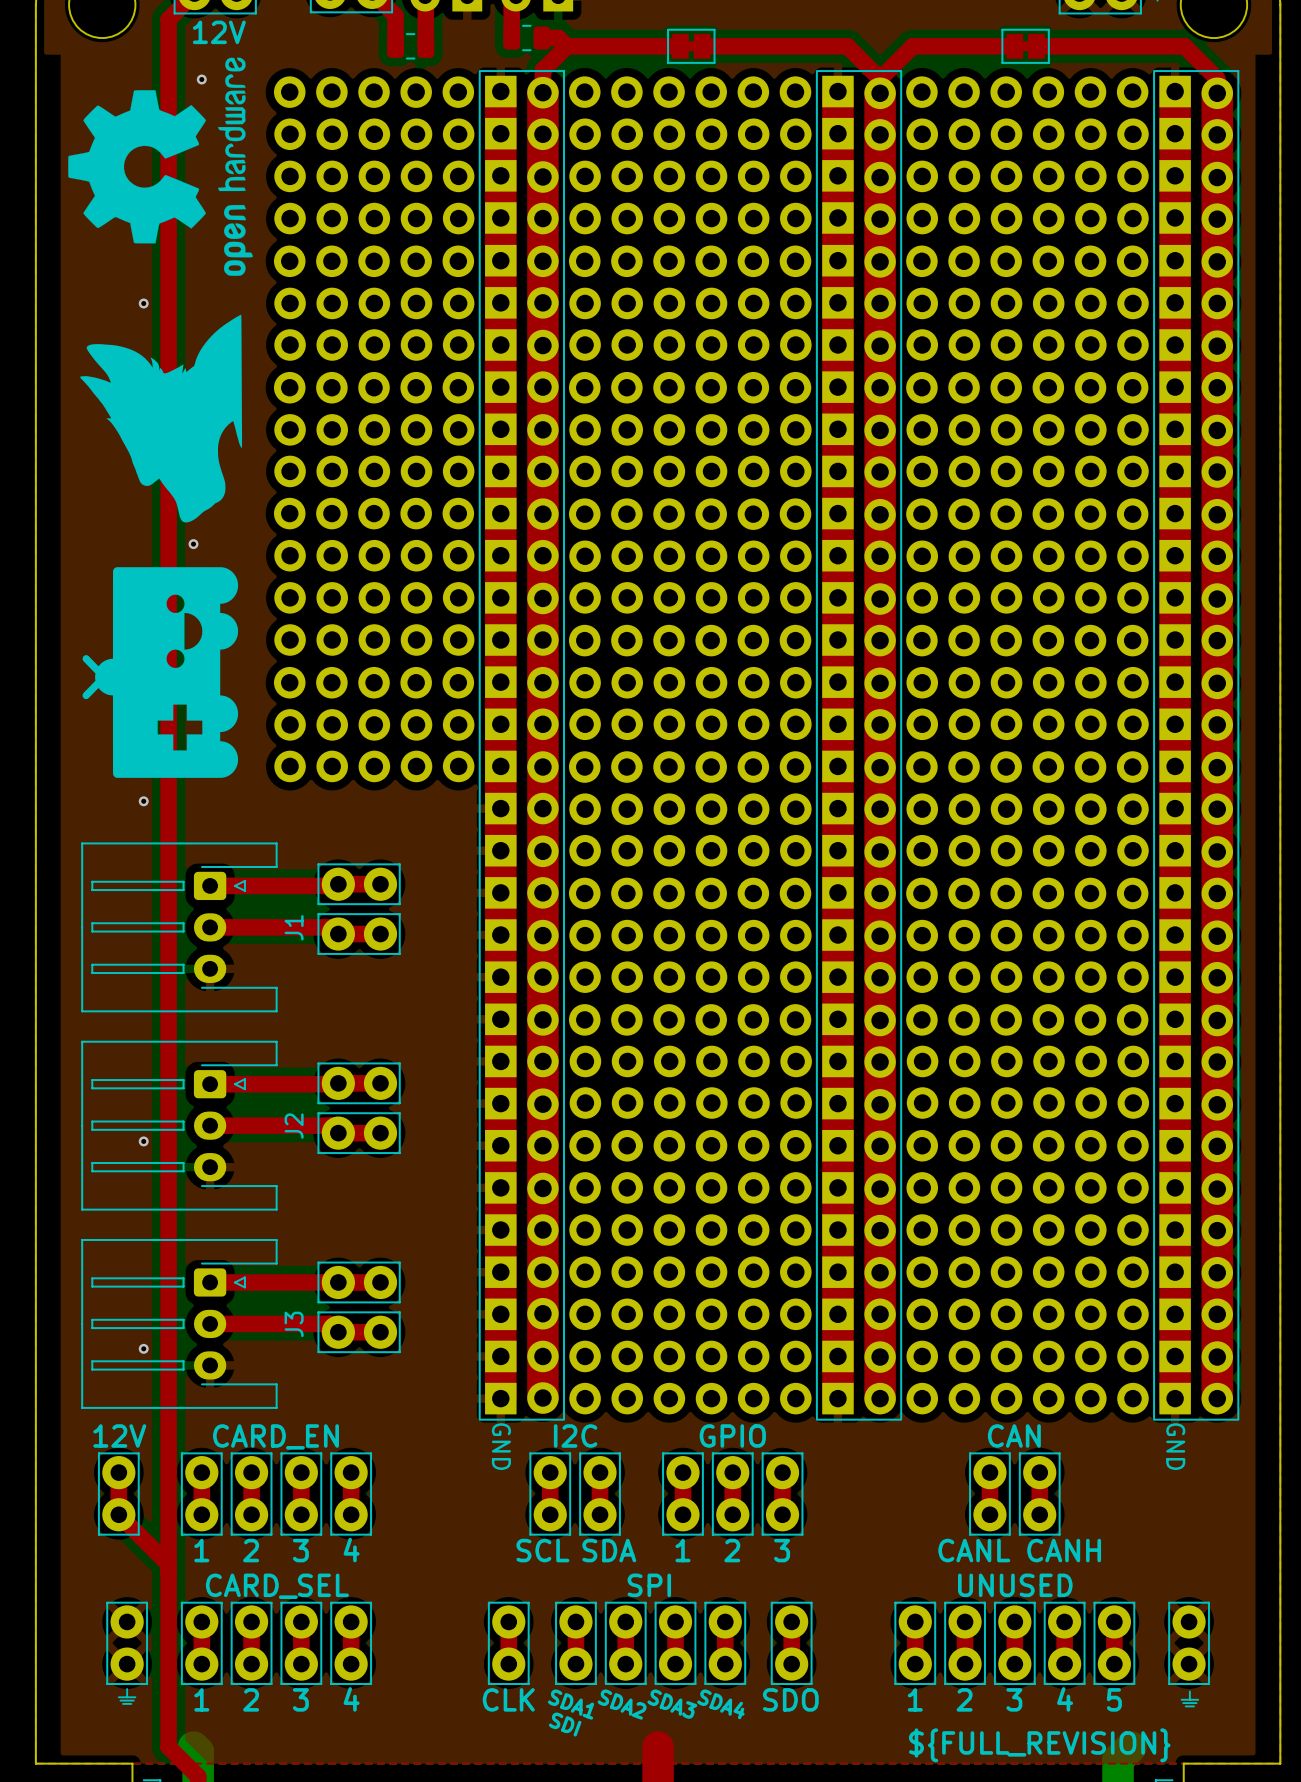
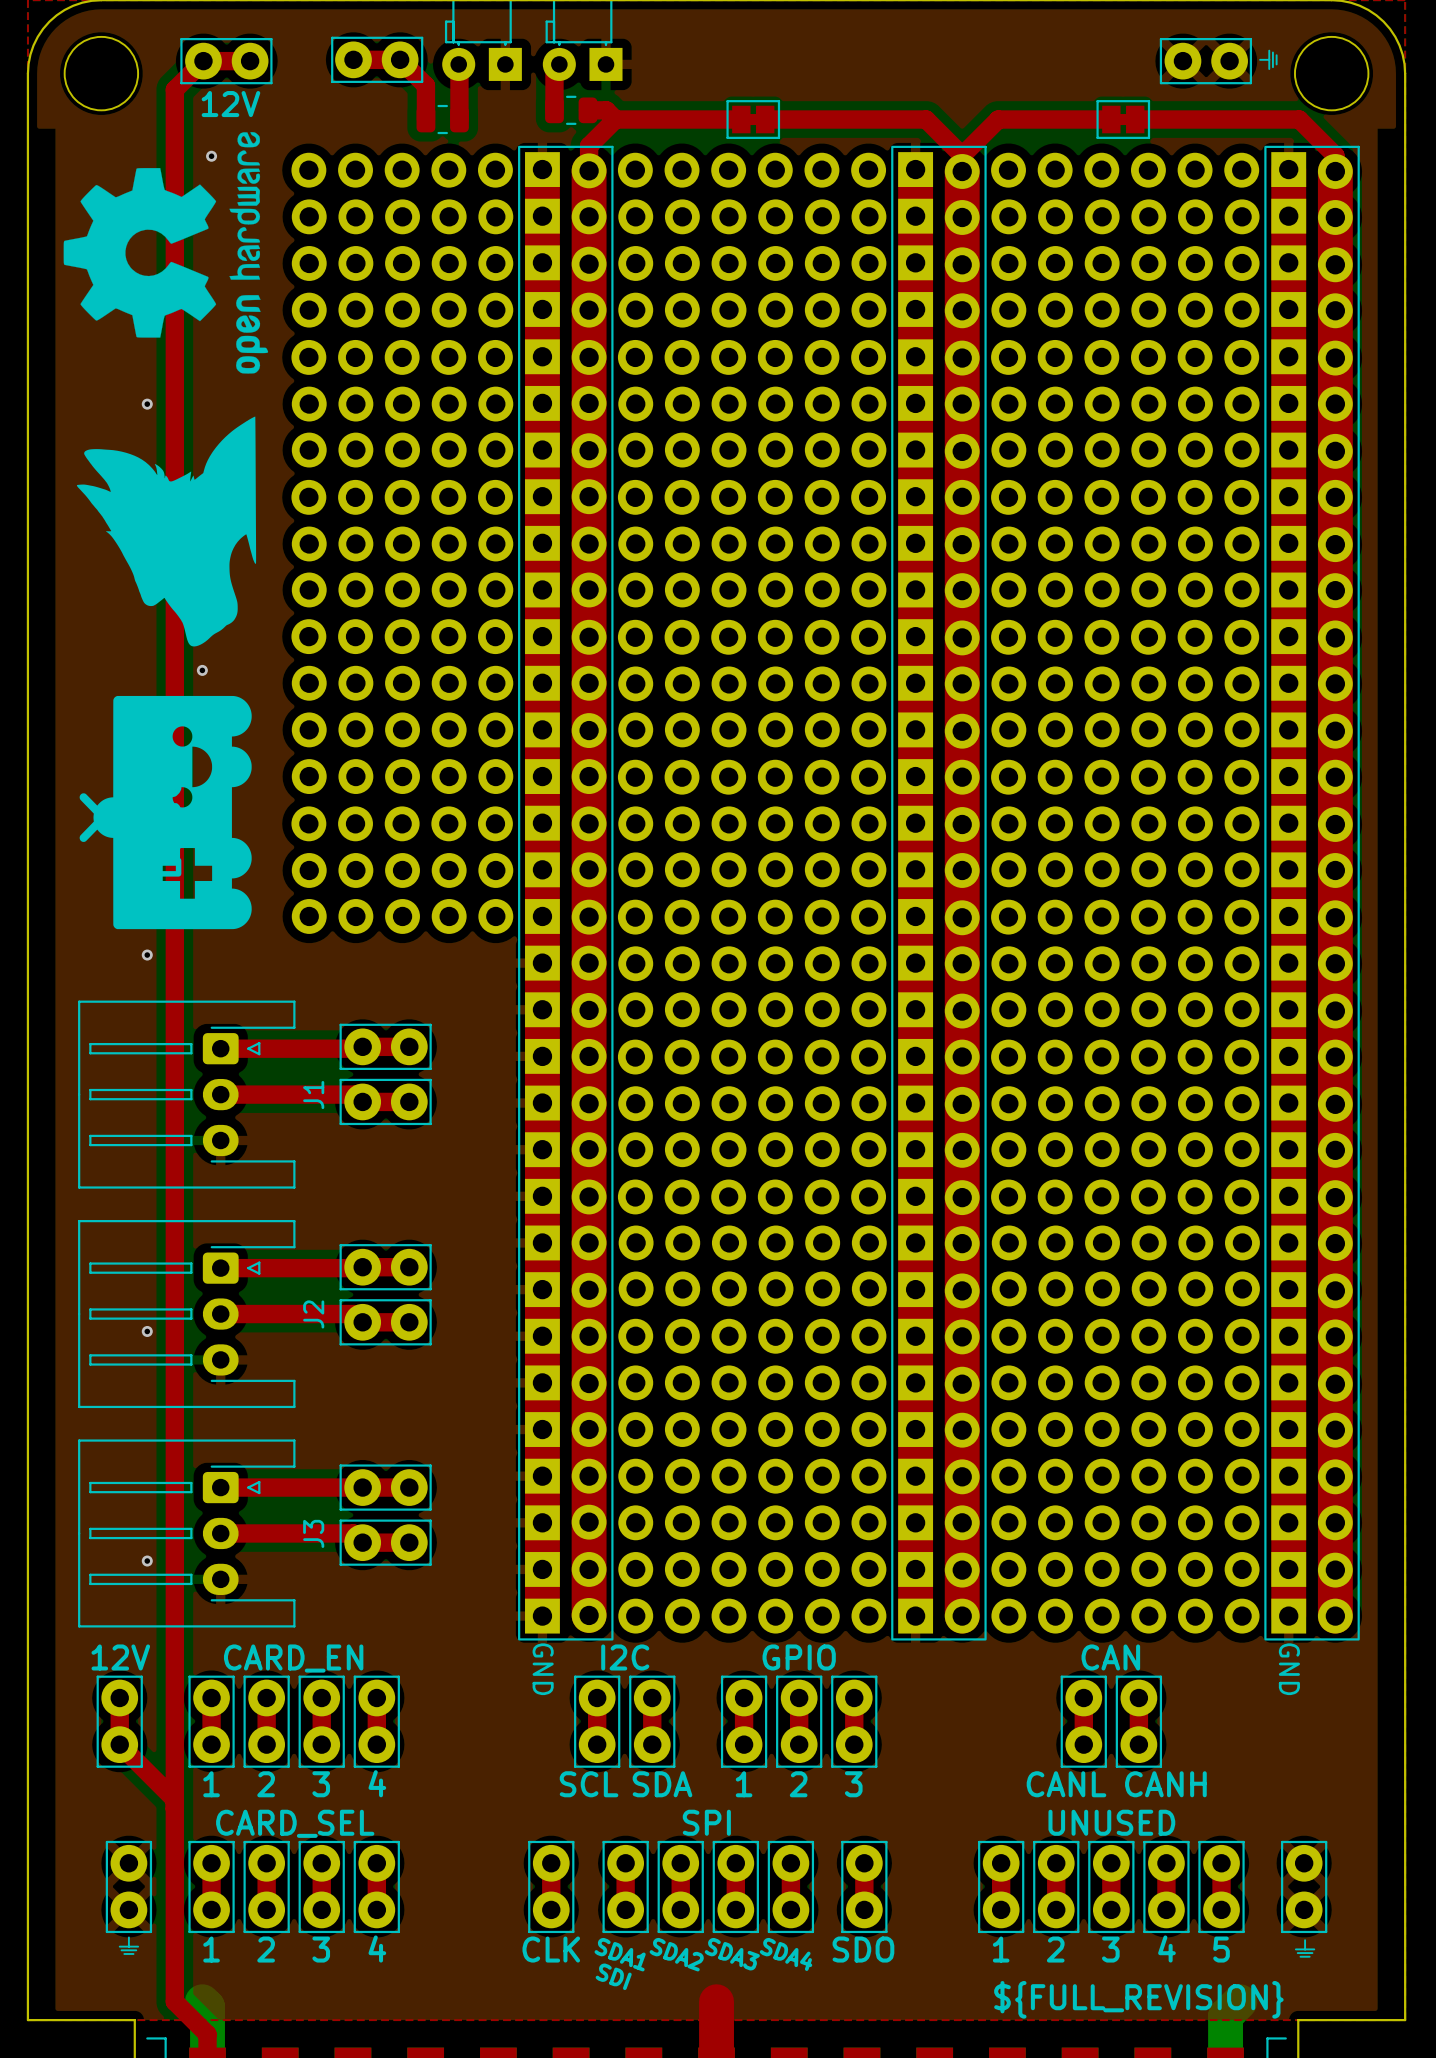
drawing: [82, 567, 239, 778] -> none
part: none -> (165, 812)

